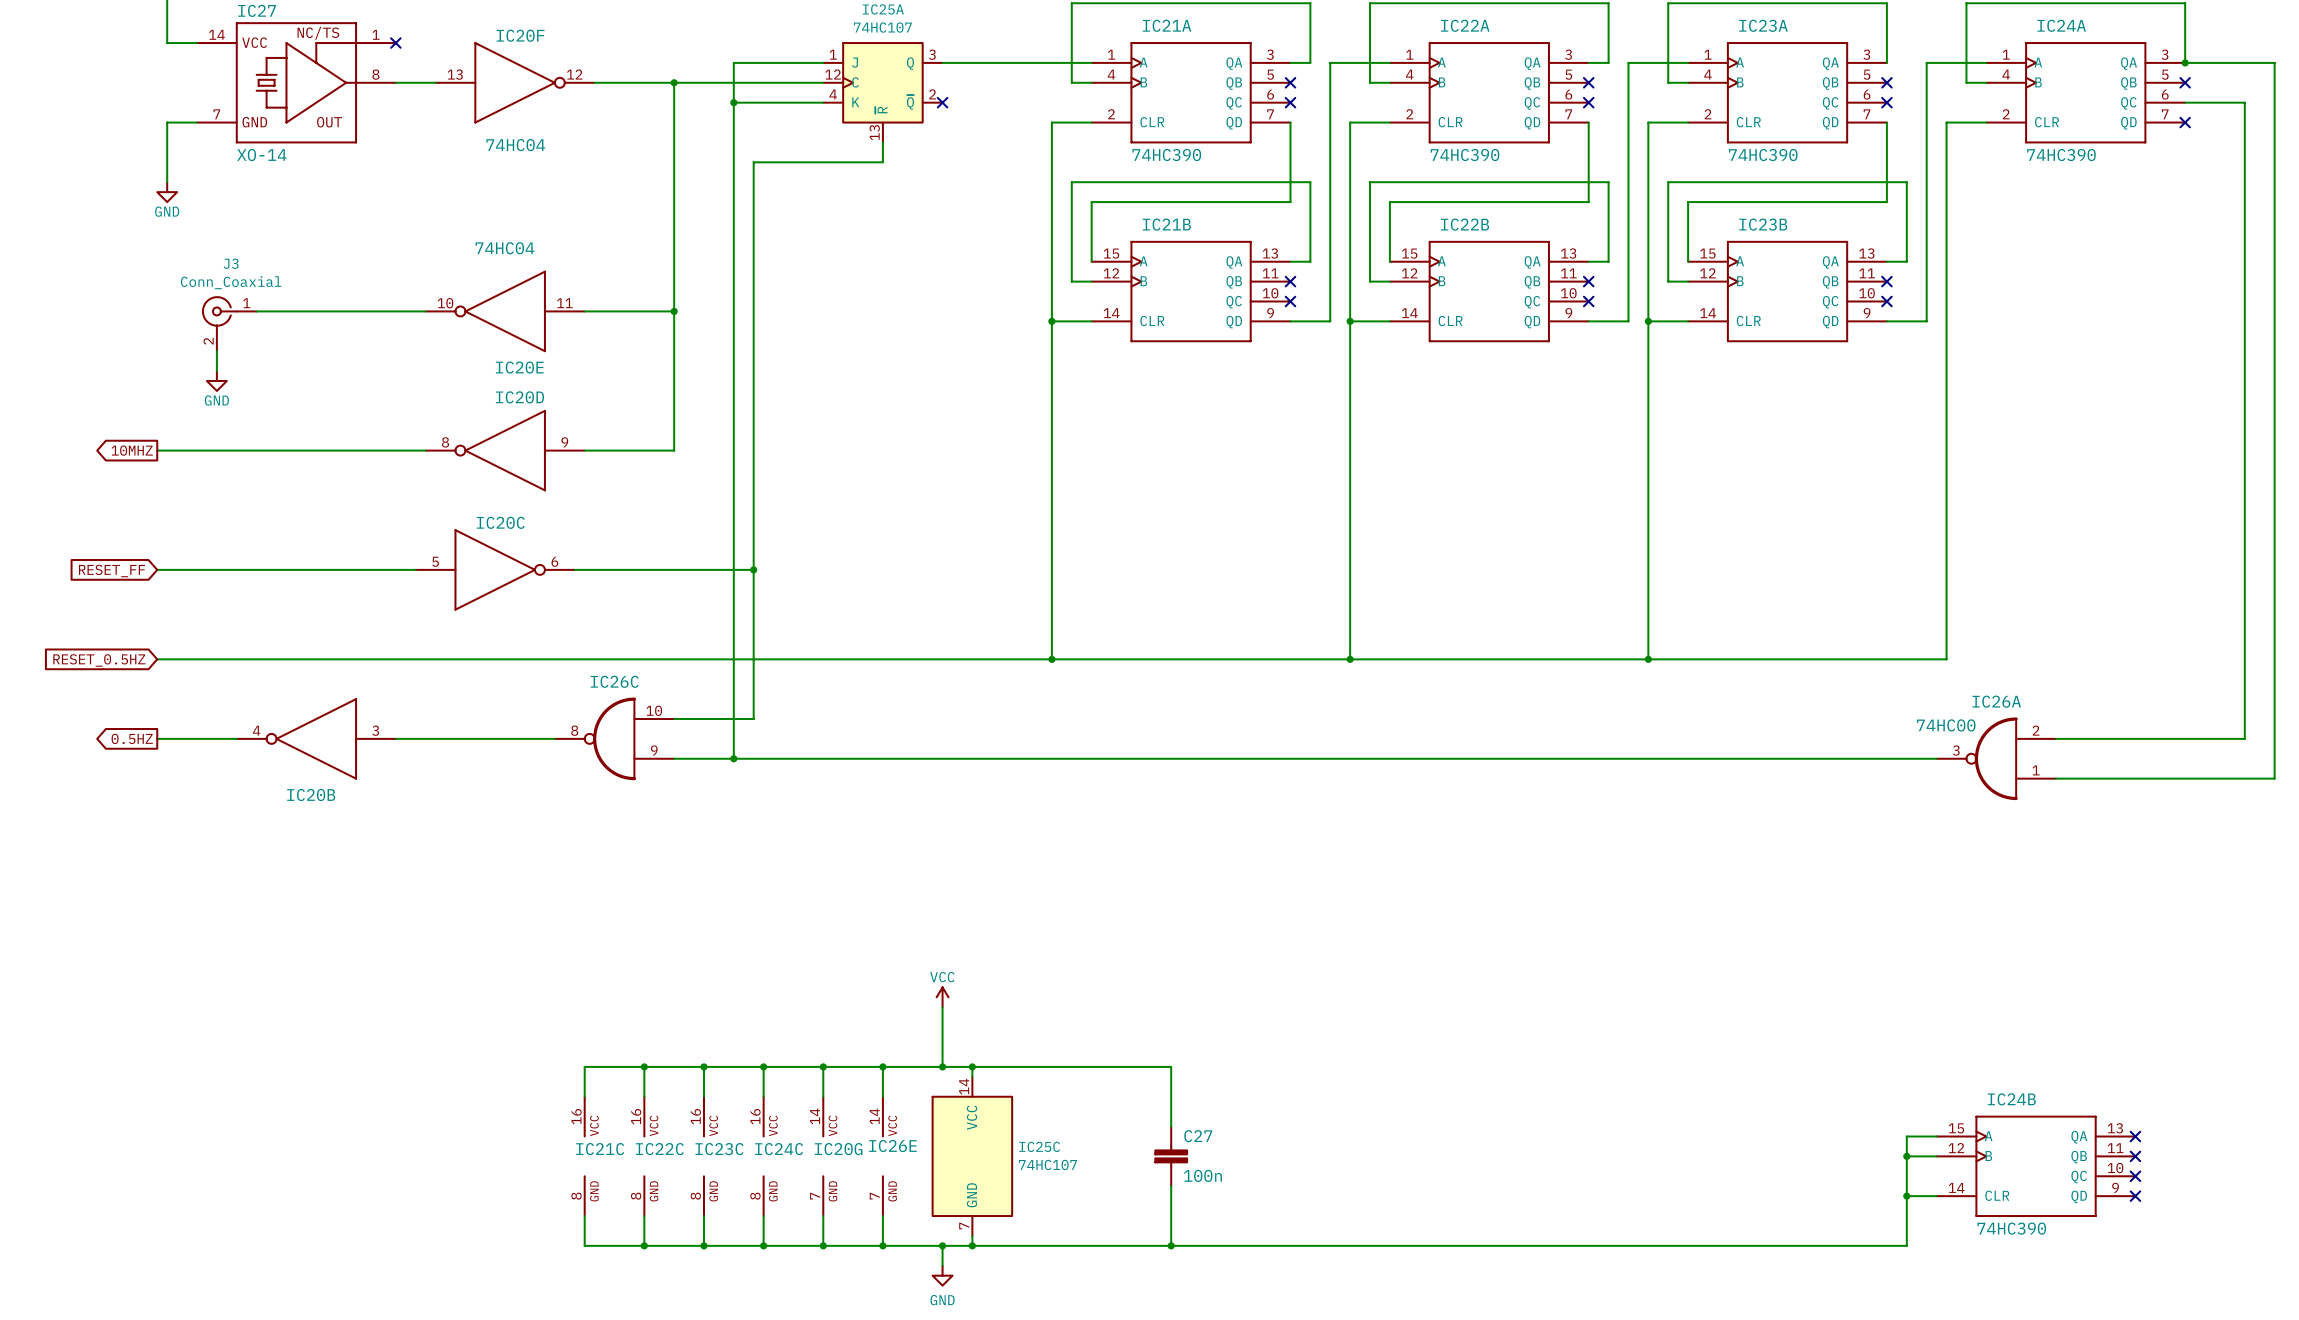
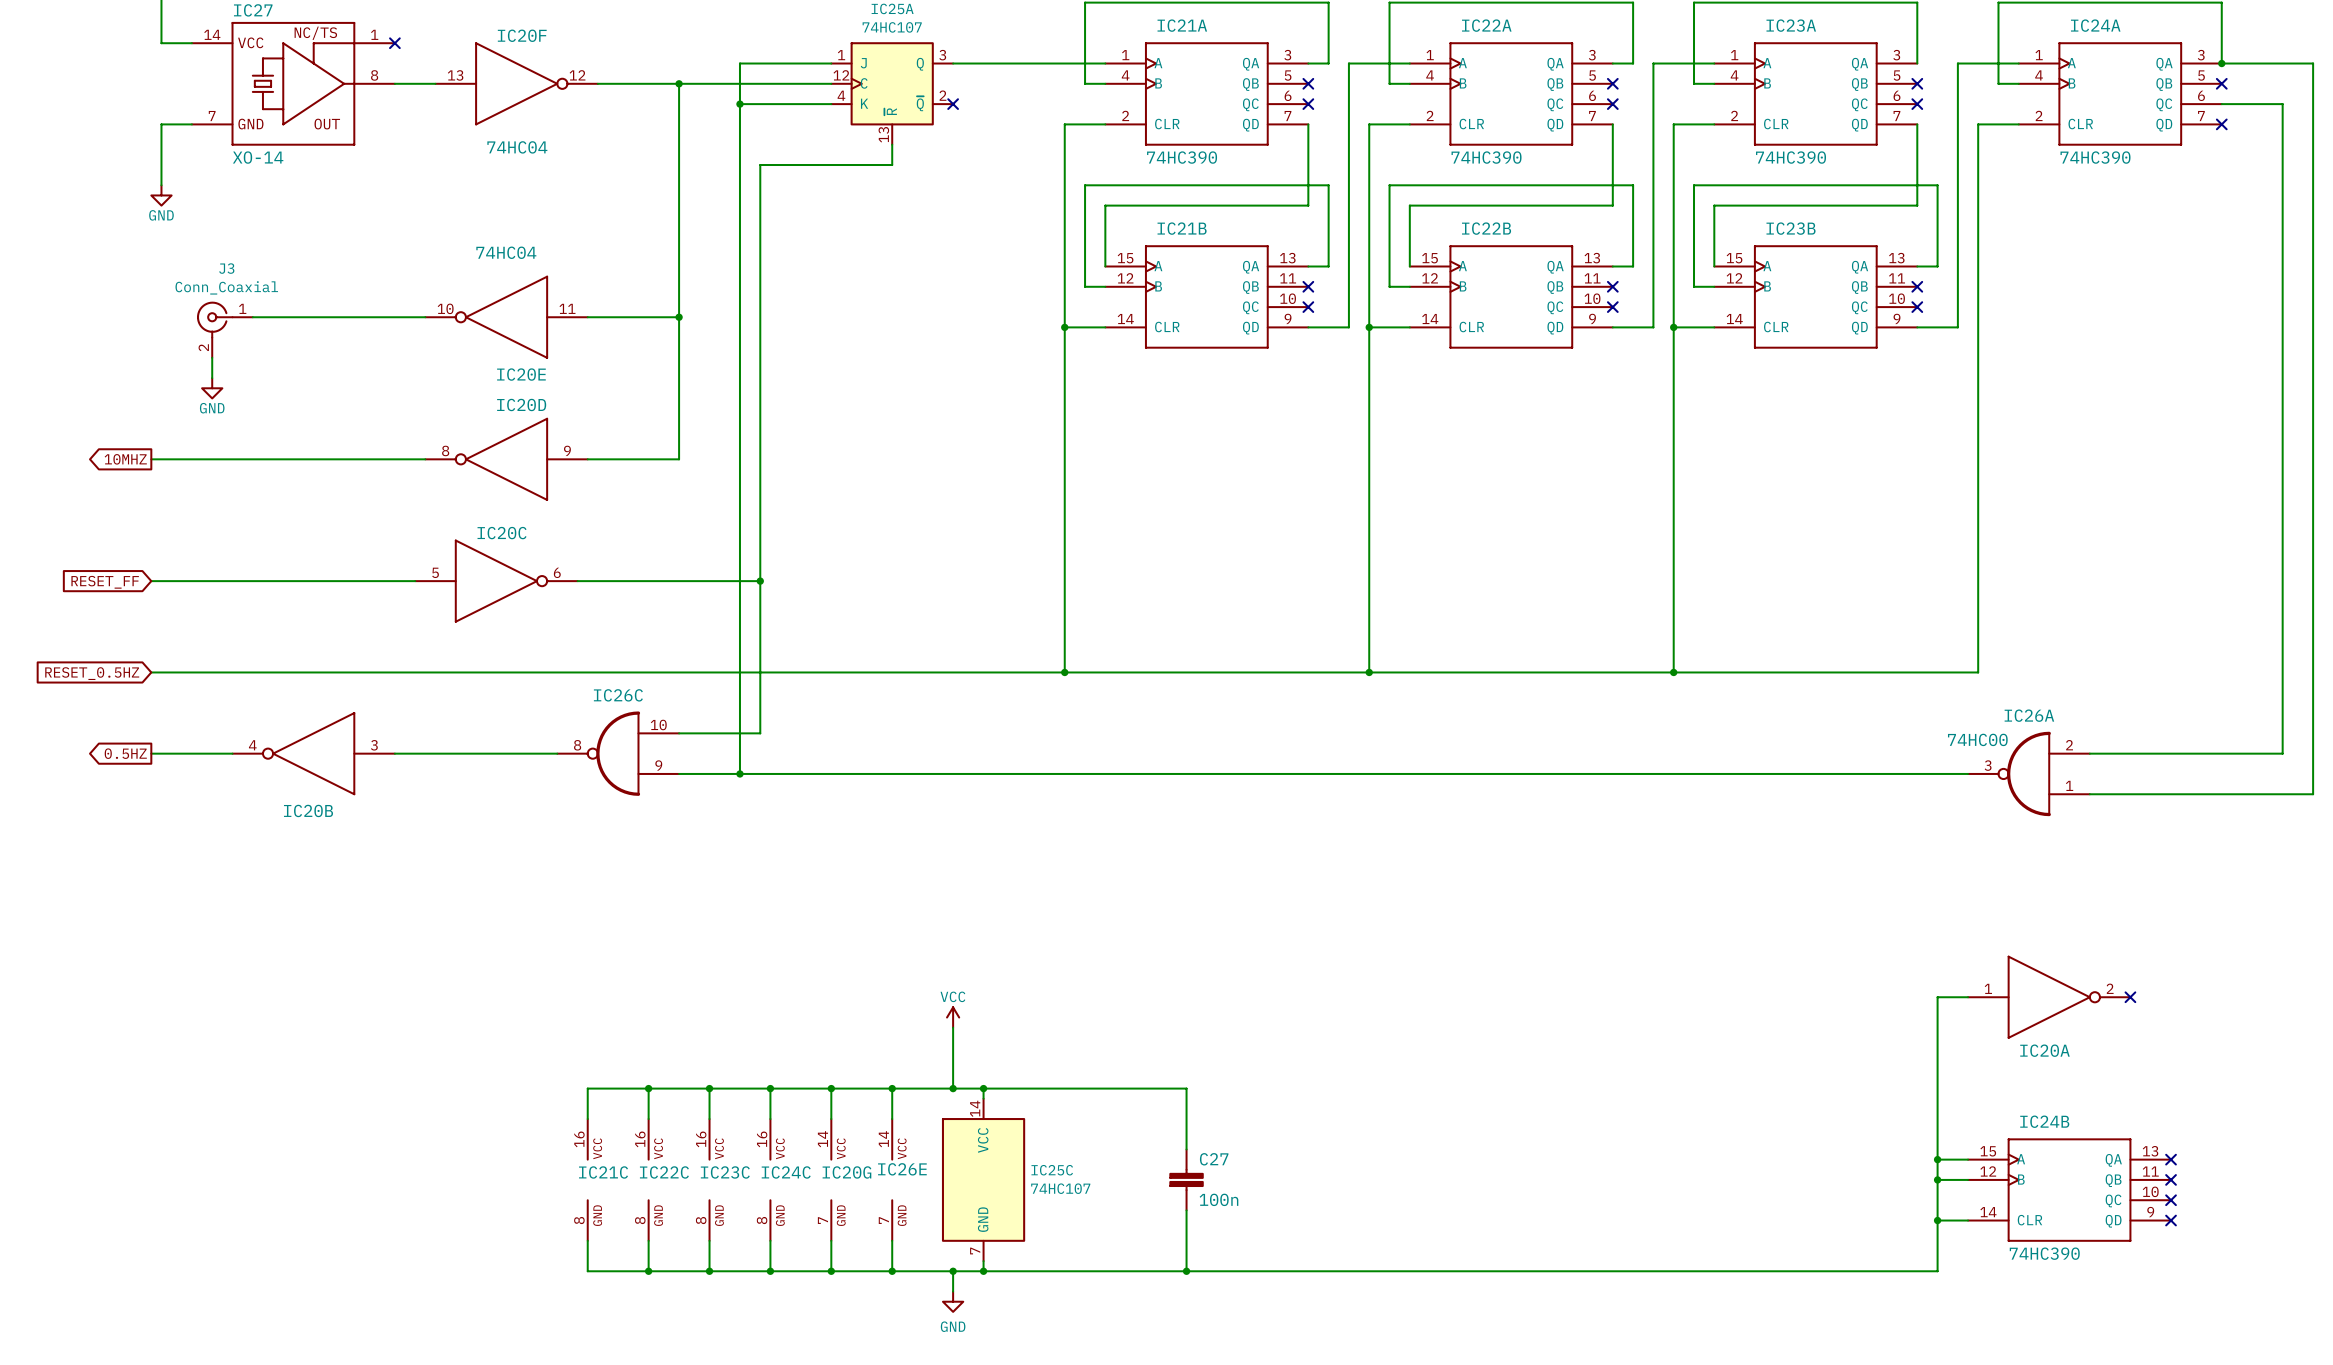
wire: none -> (1968, 997) (1937, 997) (1937, 1159)
IC20A: none -> (2049, 997)
no-connect mark: none -> (2130, 997)
junction: none -> (1937, 1159)

